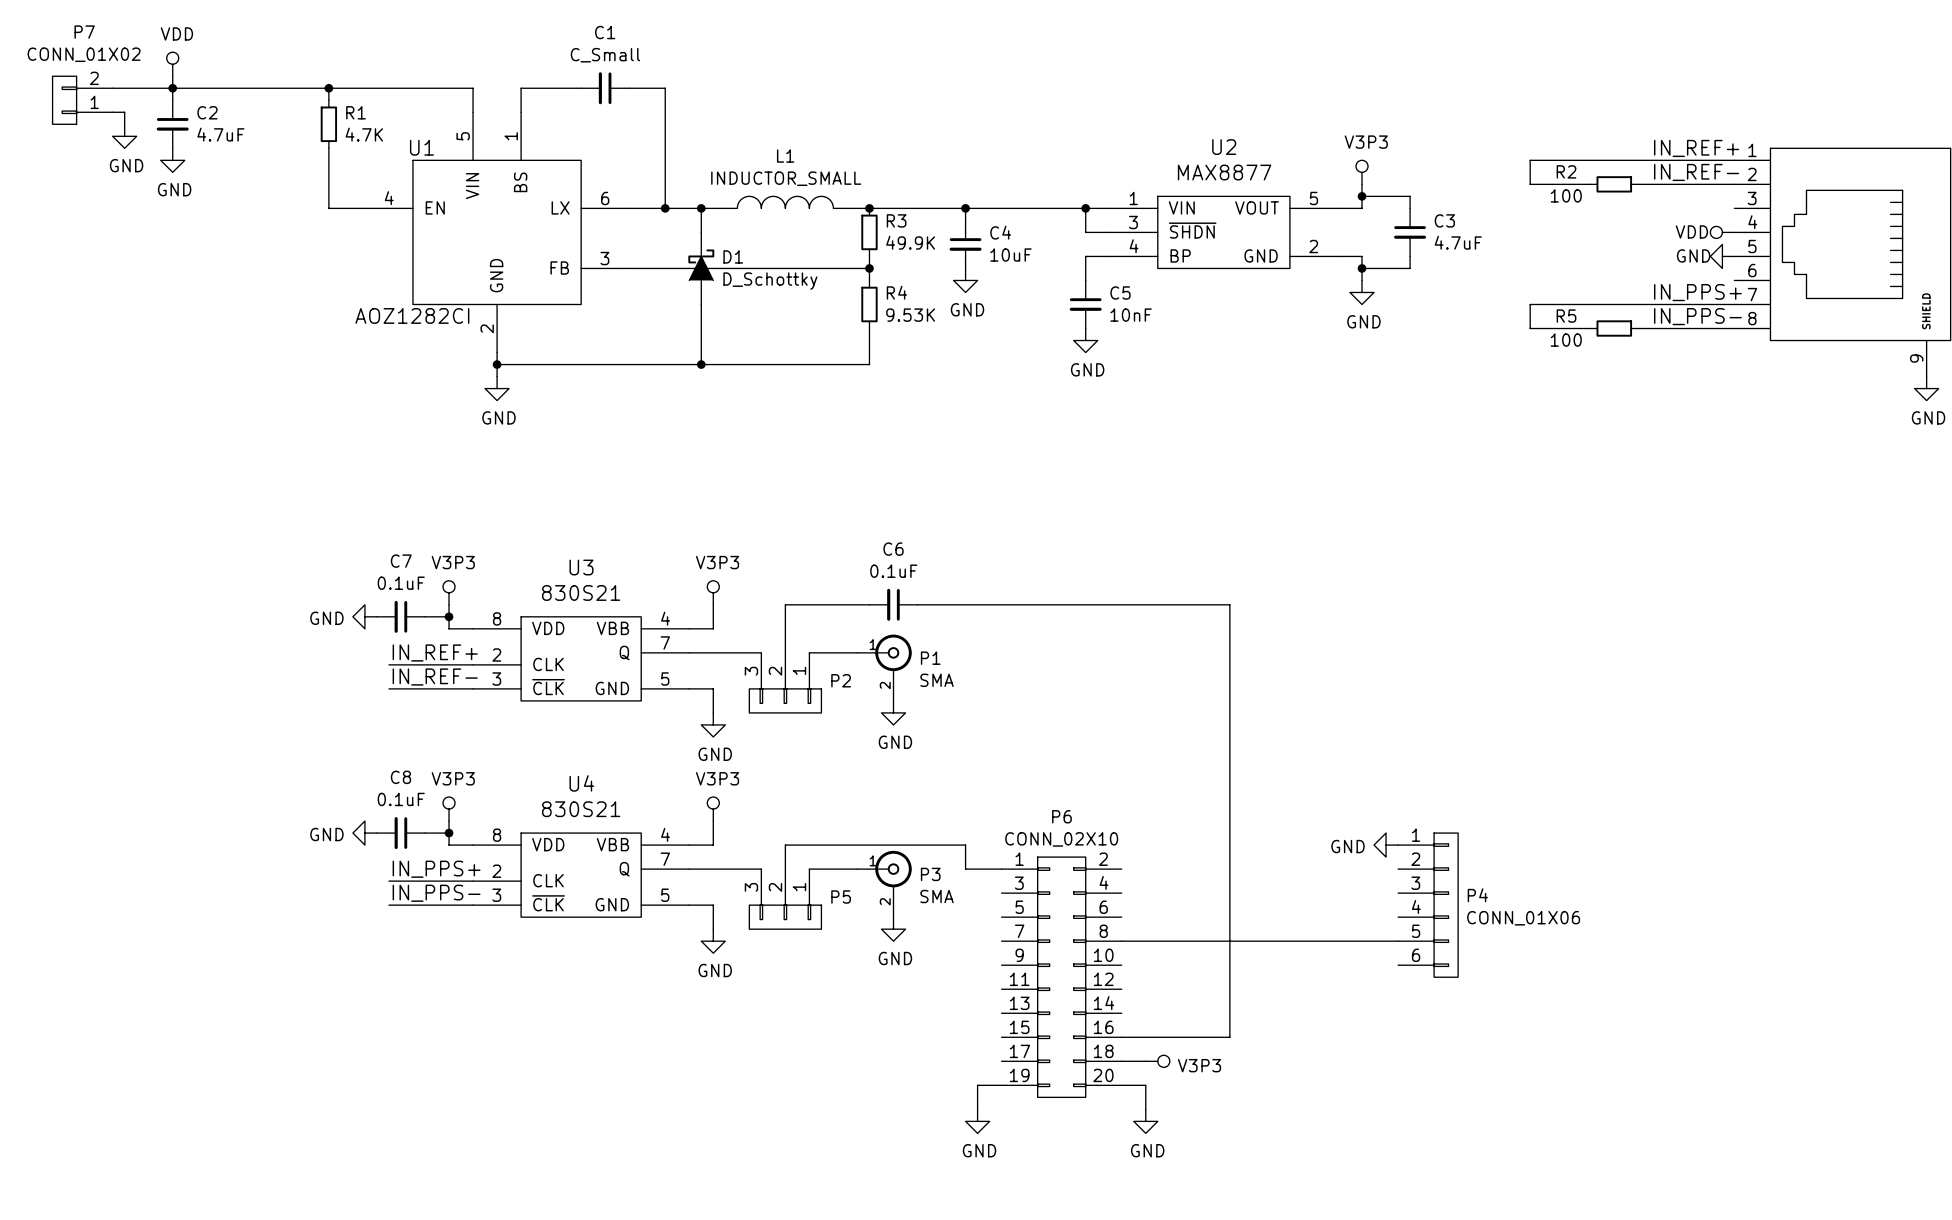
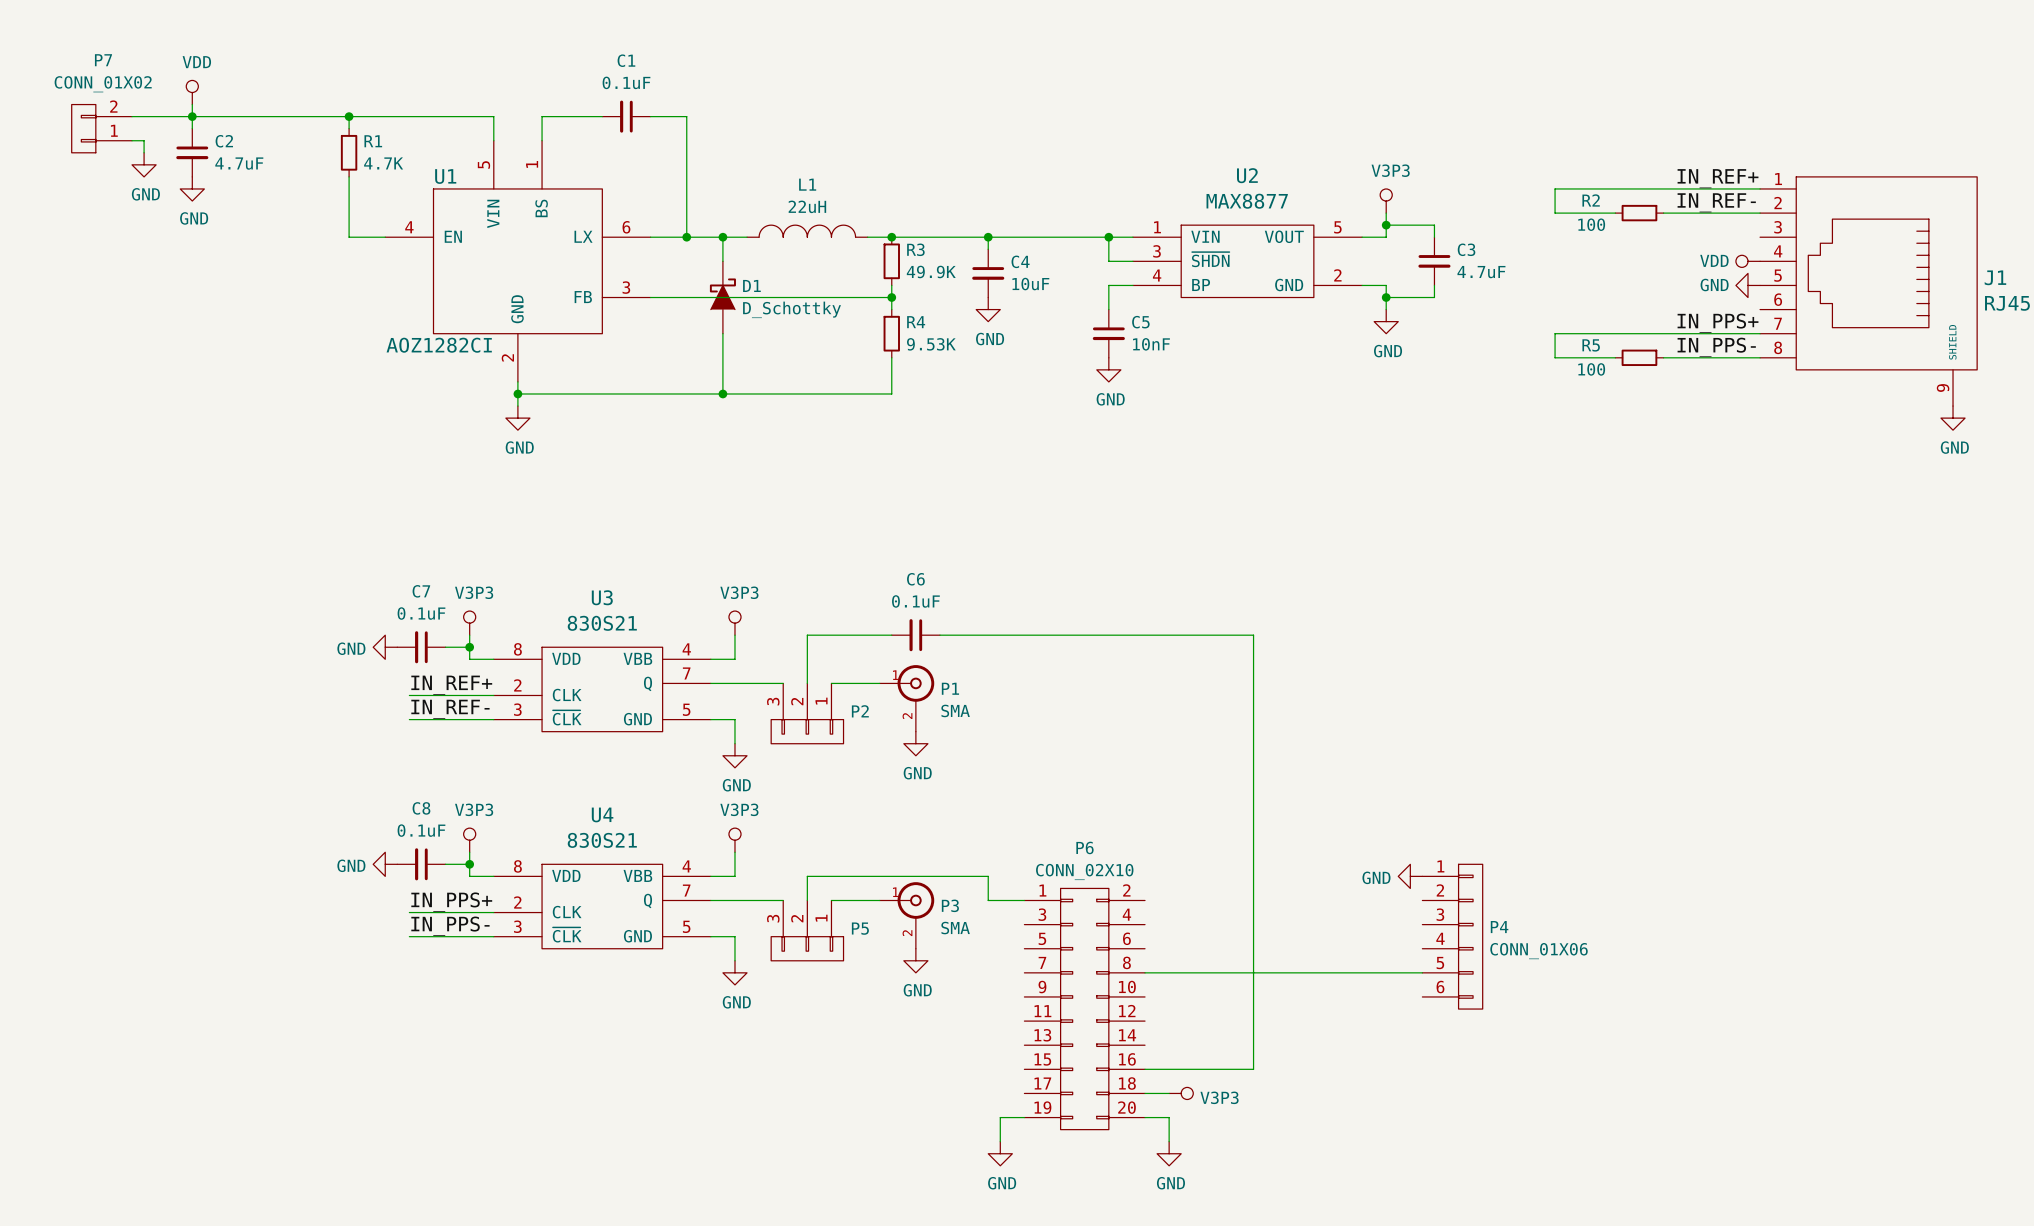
C1 value: C_Small (605, 55) -> 0.1uF (626, 82)
L1 value: INDUCTOR_SMALL (786, 178) -> 22uH (807, 206)

